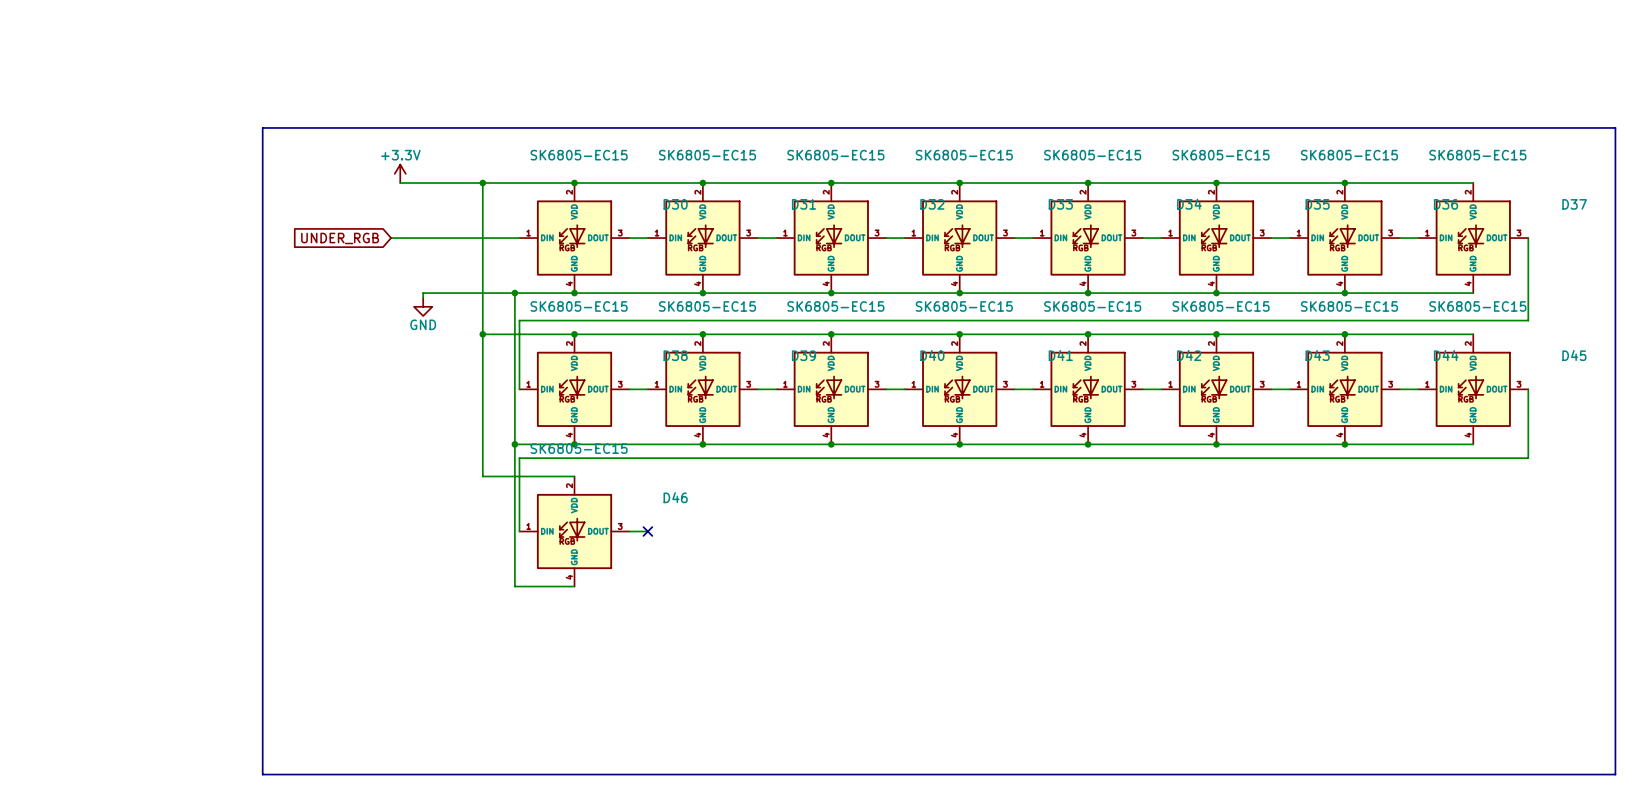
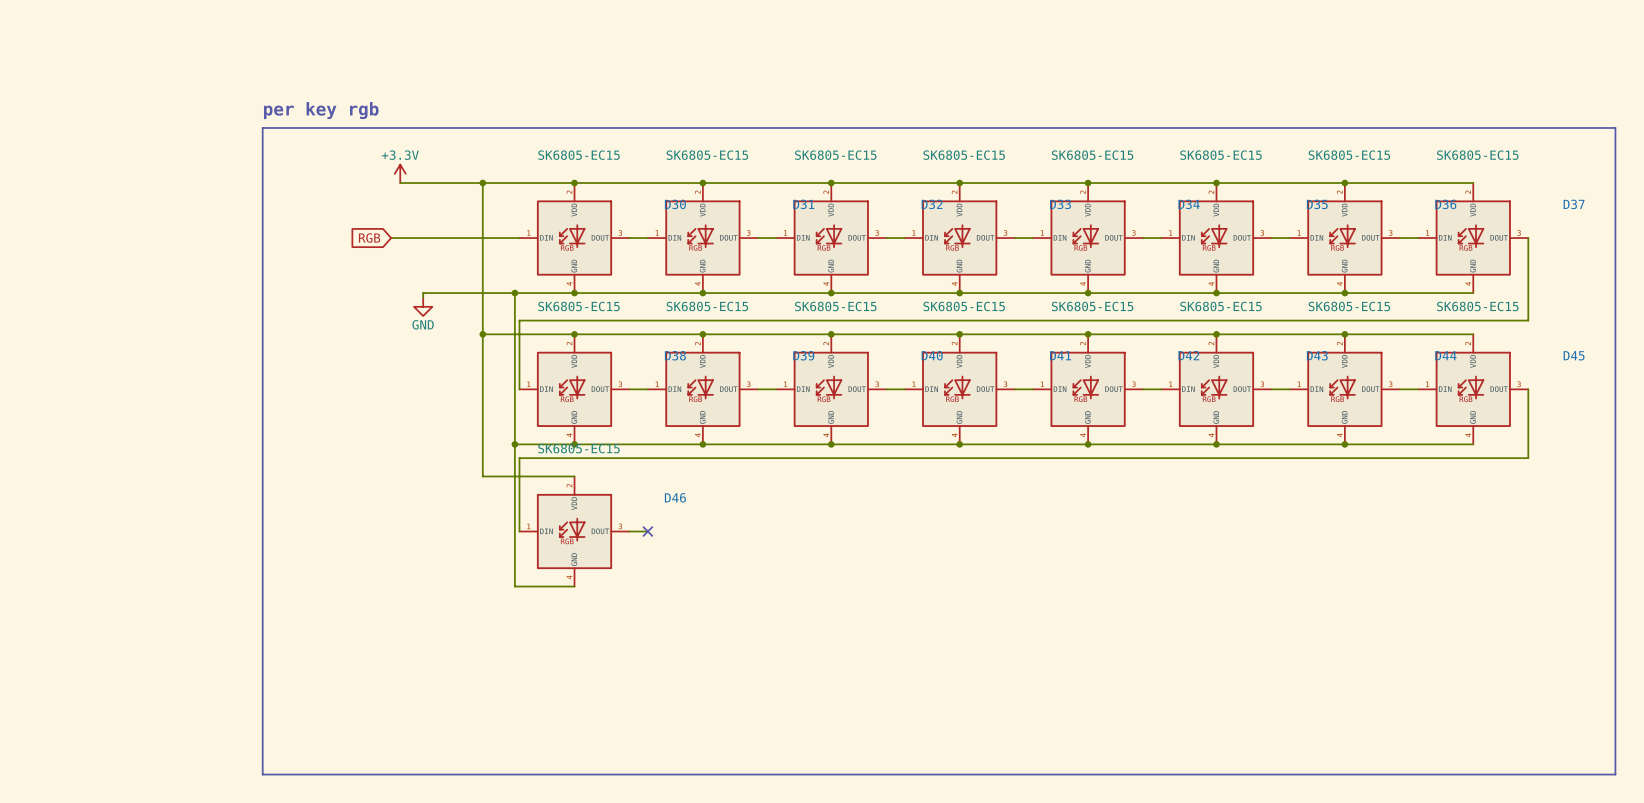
text: none -> per key rgb (321, 110)
global label: UNDER_RGB (340, 238) -> RGB (369, 238)

